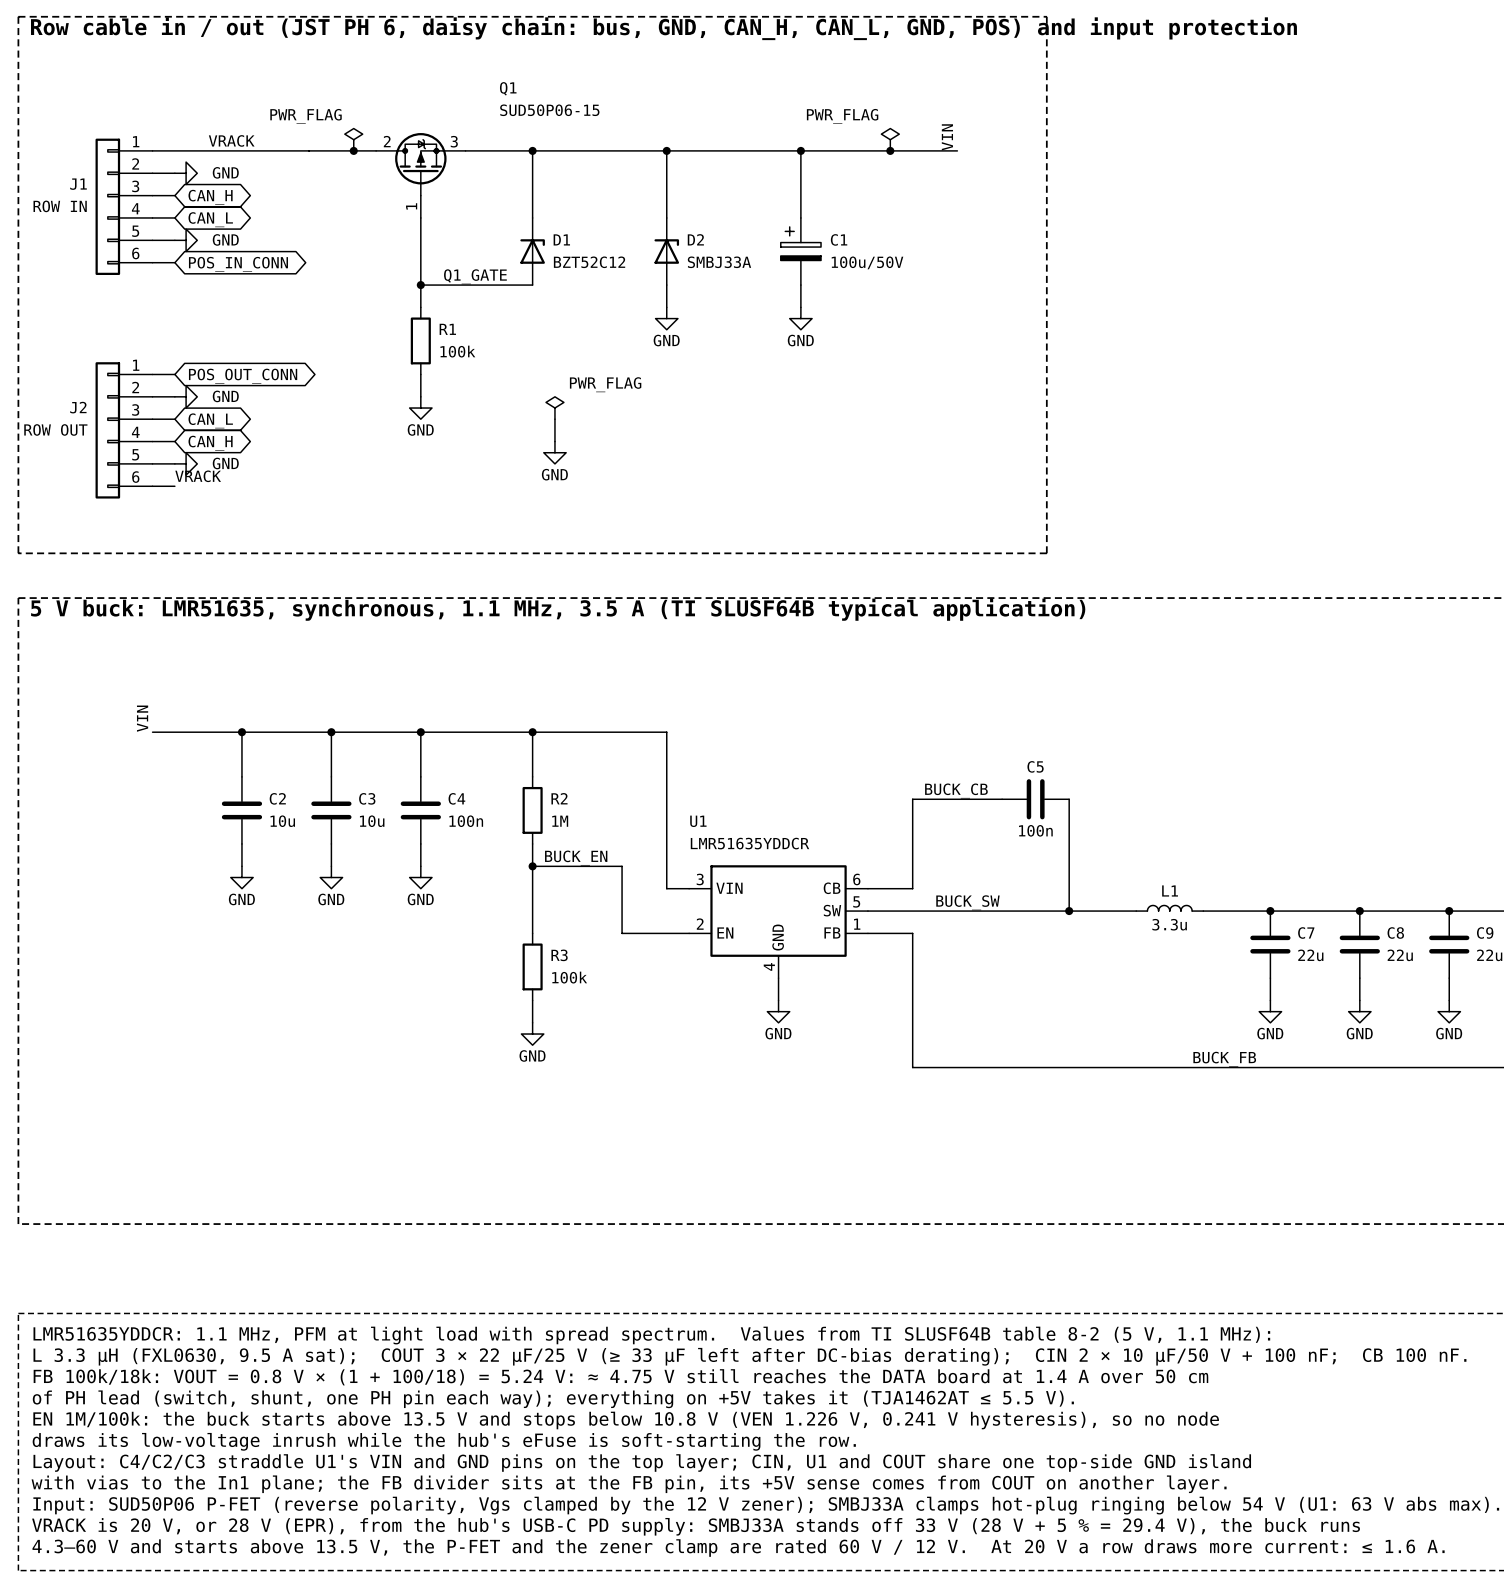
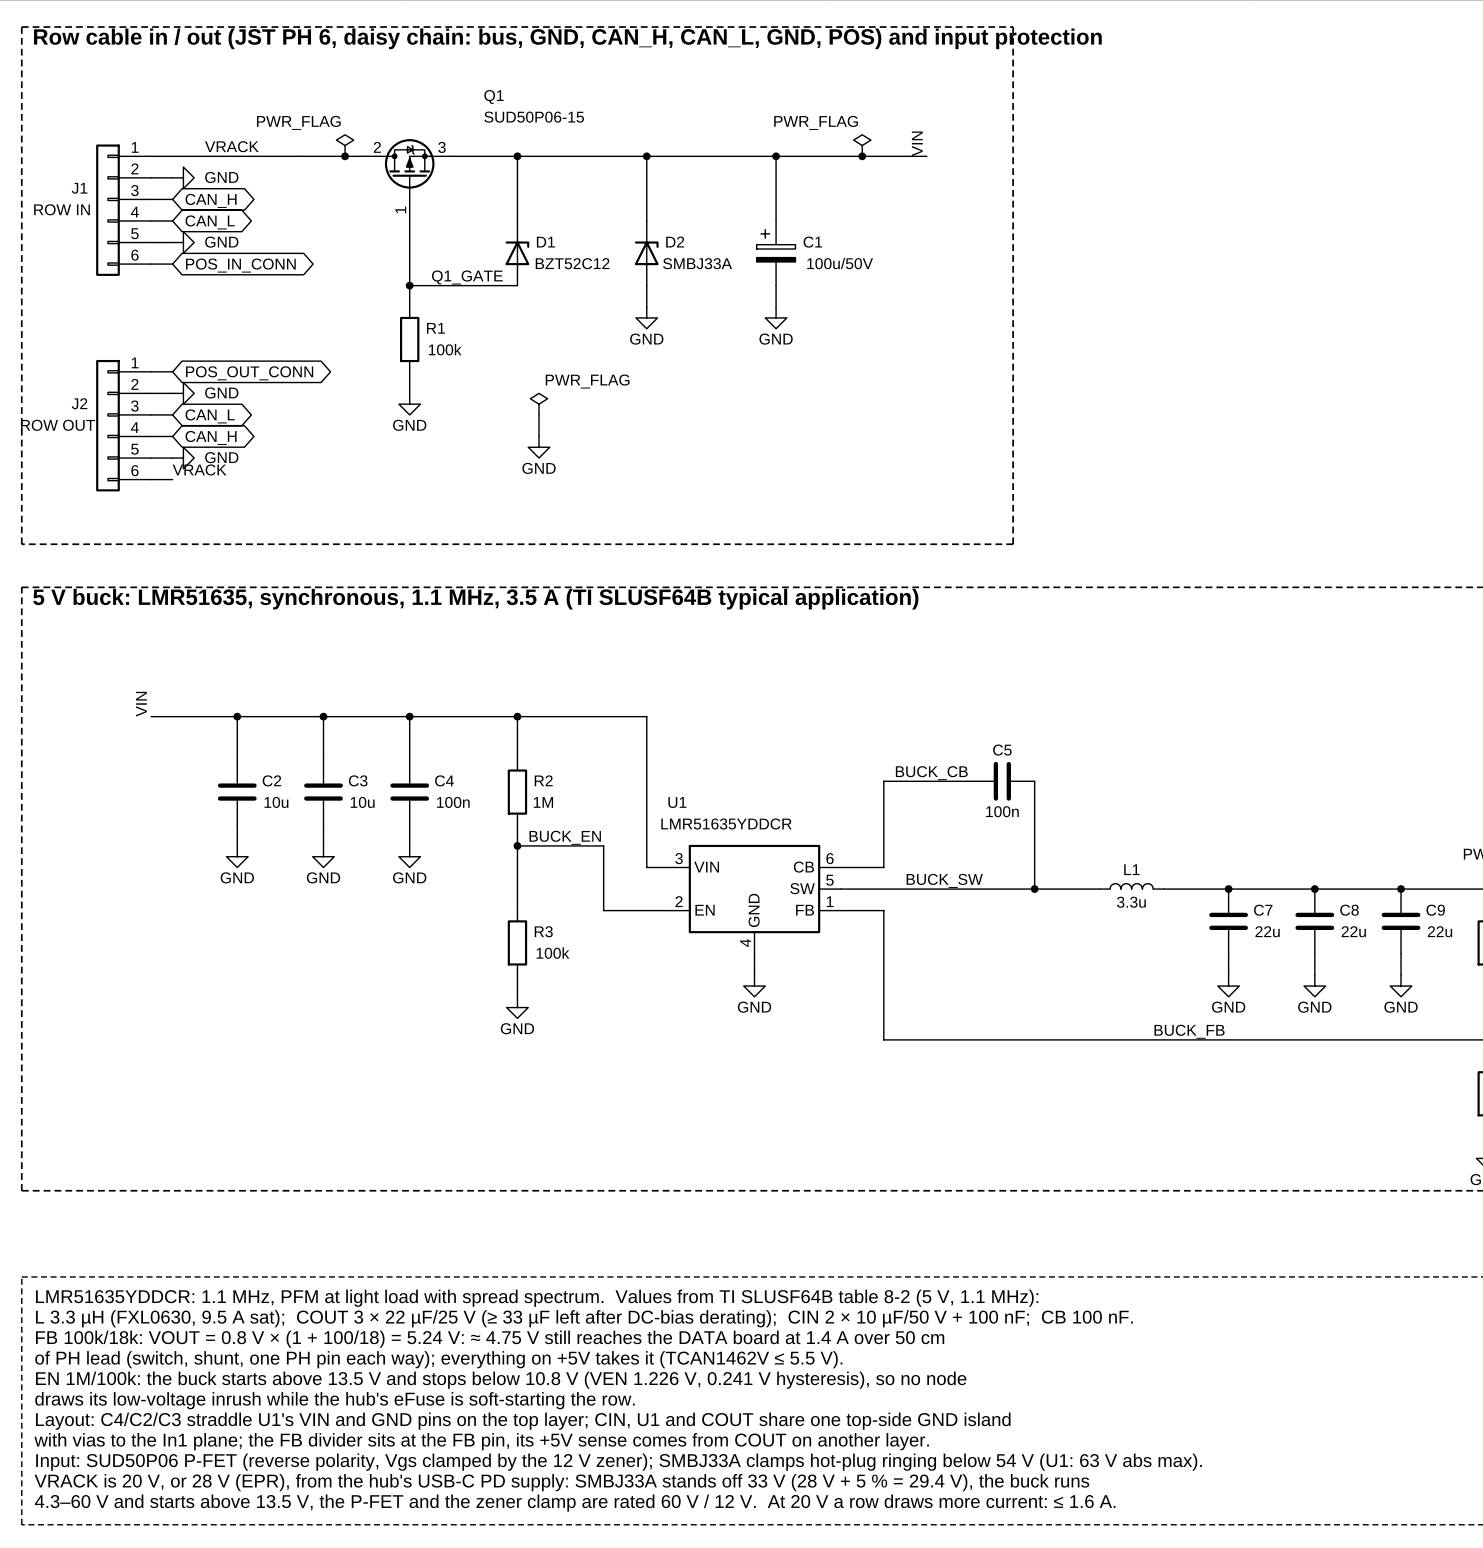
text: of PH lead (switch, shunt, one PH pin each way); everything on +5V takes it (TJA1462AT ≤ 5.5 V). (553, 1399) -> of PH lead (switch, shunt, one PH pin each way); everything on +5V takes it (TCAN1462V ≤ 5.5 V). (438, 1359)

